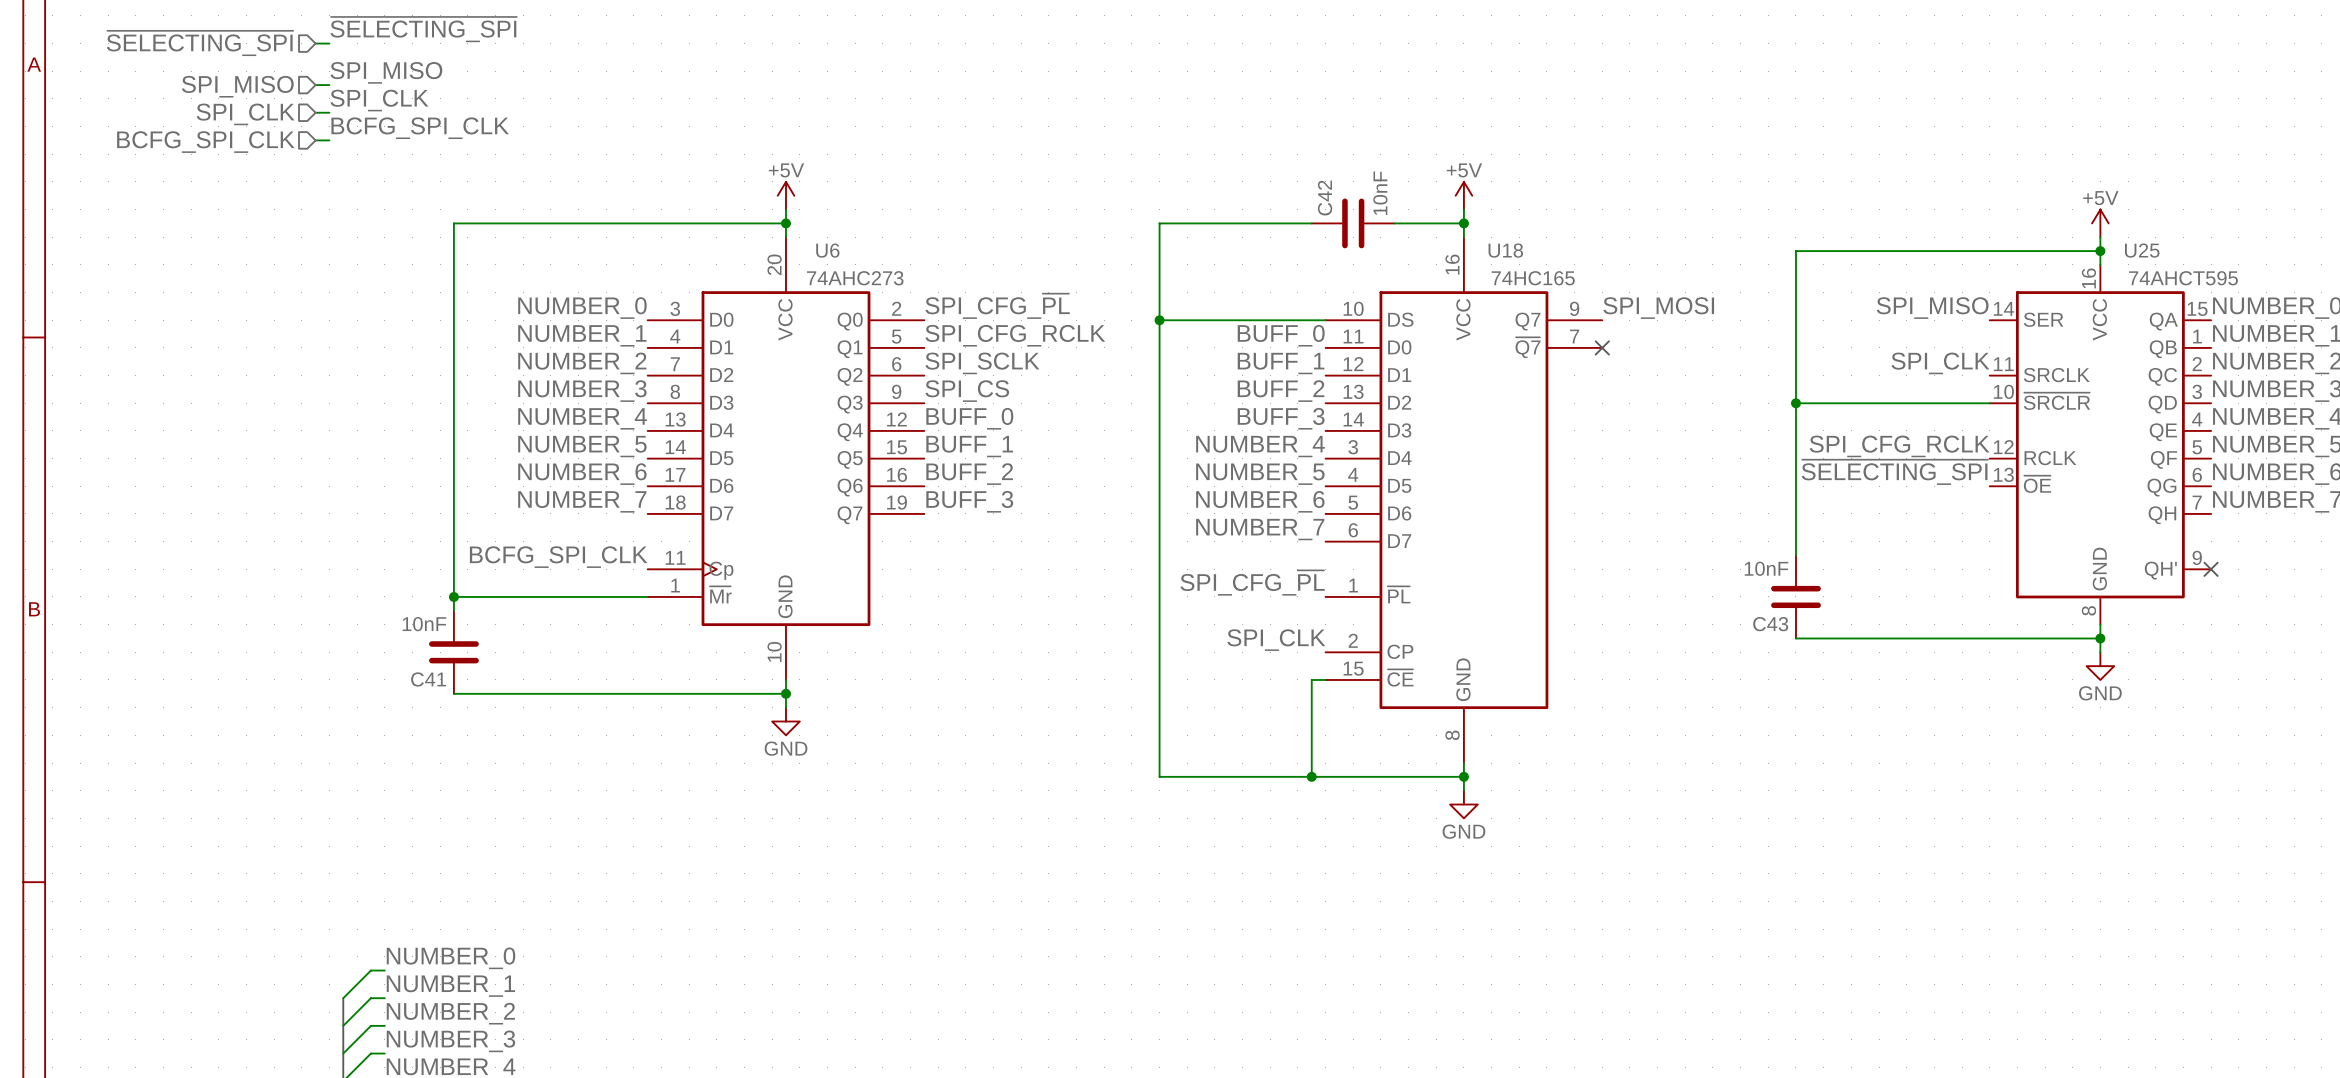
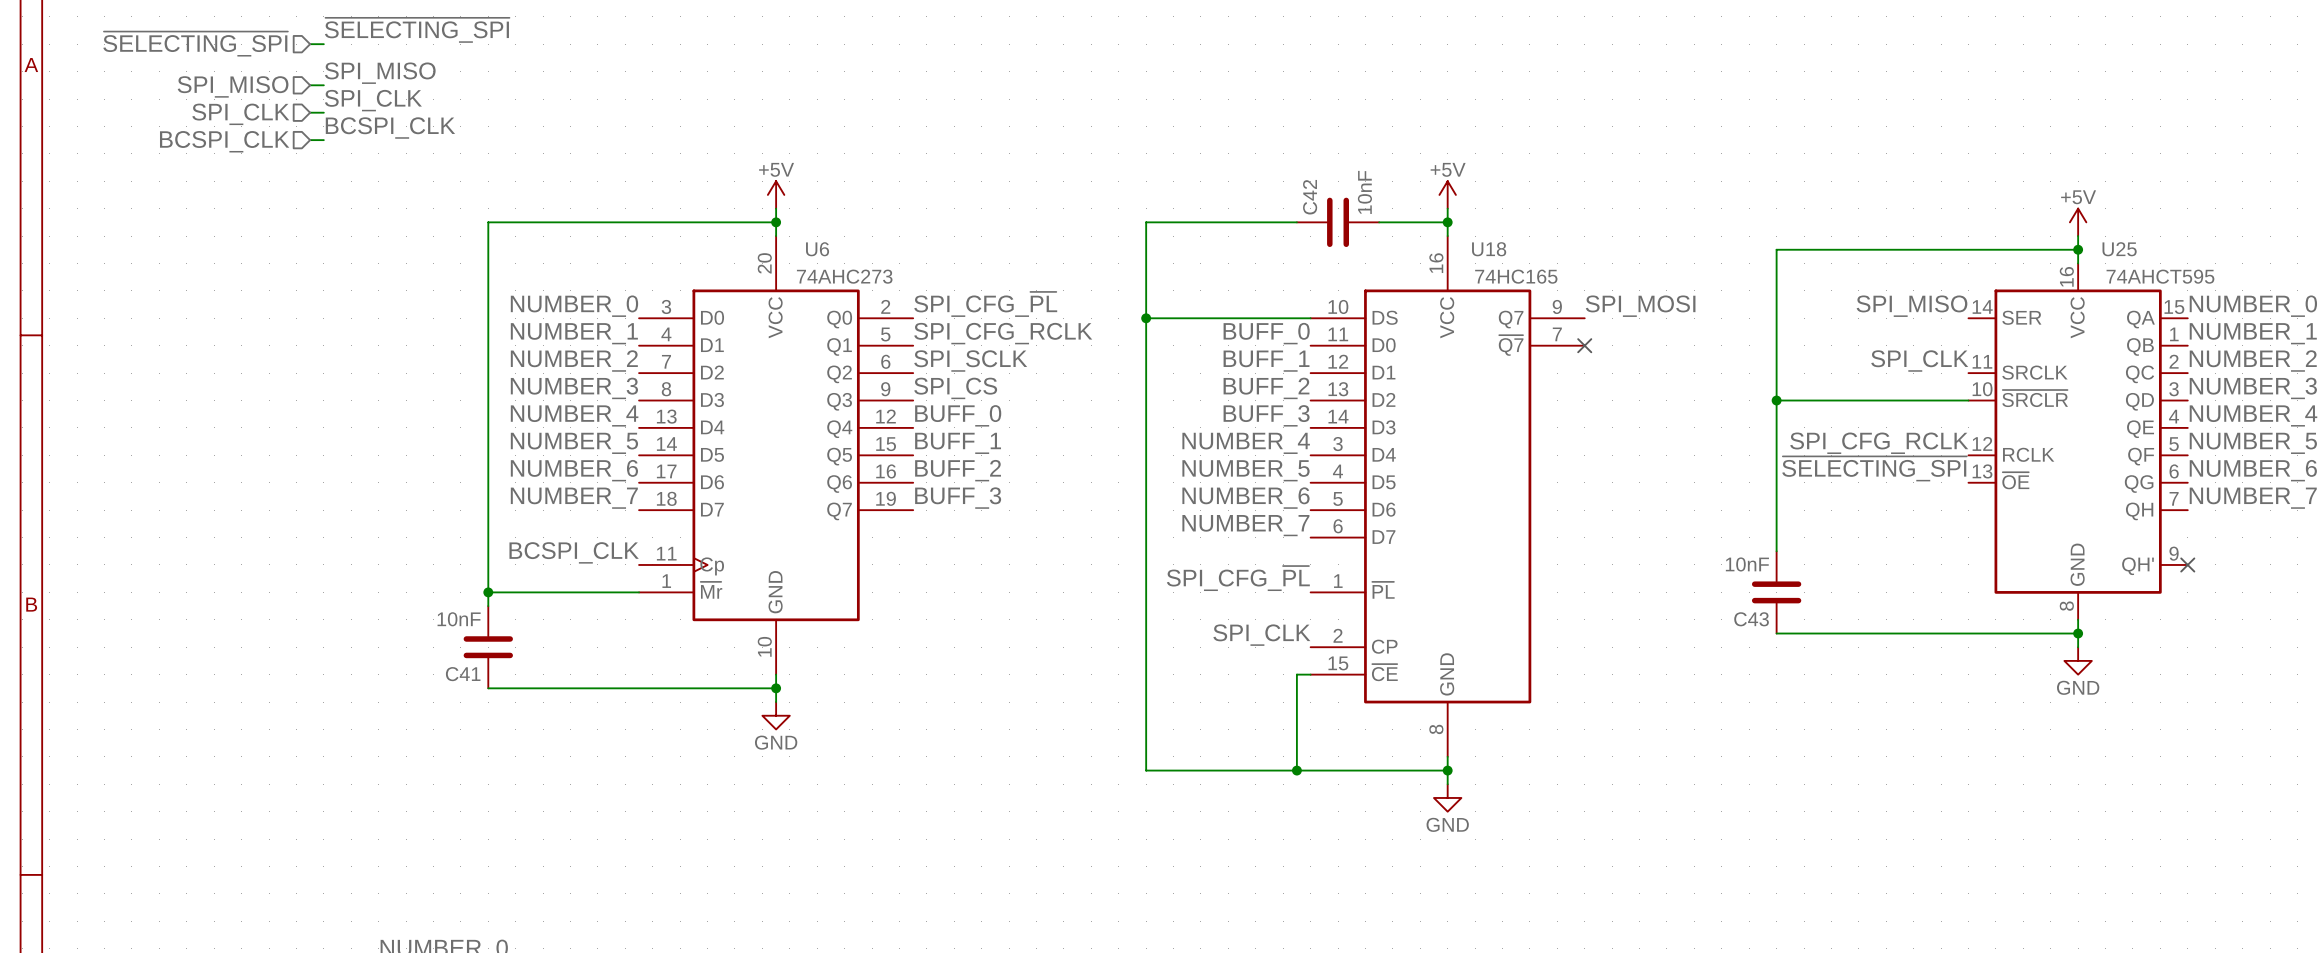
label: BCFG_SPI_CLK (420, 128) -> BCSPI_CLK (390, 128)
hierarchical label: BCFG_SPI_CLK (205, 142) -> BCSPI_CLK (224, 141)
wire: (495, 223) (453, 223) (453, 610) -> (488, 222) (488, 606)
label: BCFG_SPI_CLK (558, 557) -> BCSPI_CLK (574, 552)
wire: (453, 596) (495, 596) -> none
junction position: (453, 596) -> (488, 592)
C41 position: (453, 652) -> (488, 647)
wire: (453, 693) (495, 693) -> none

